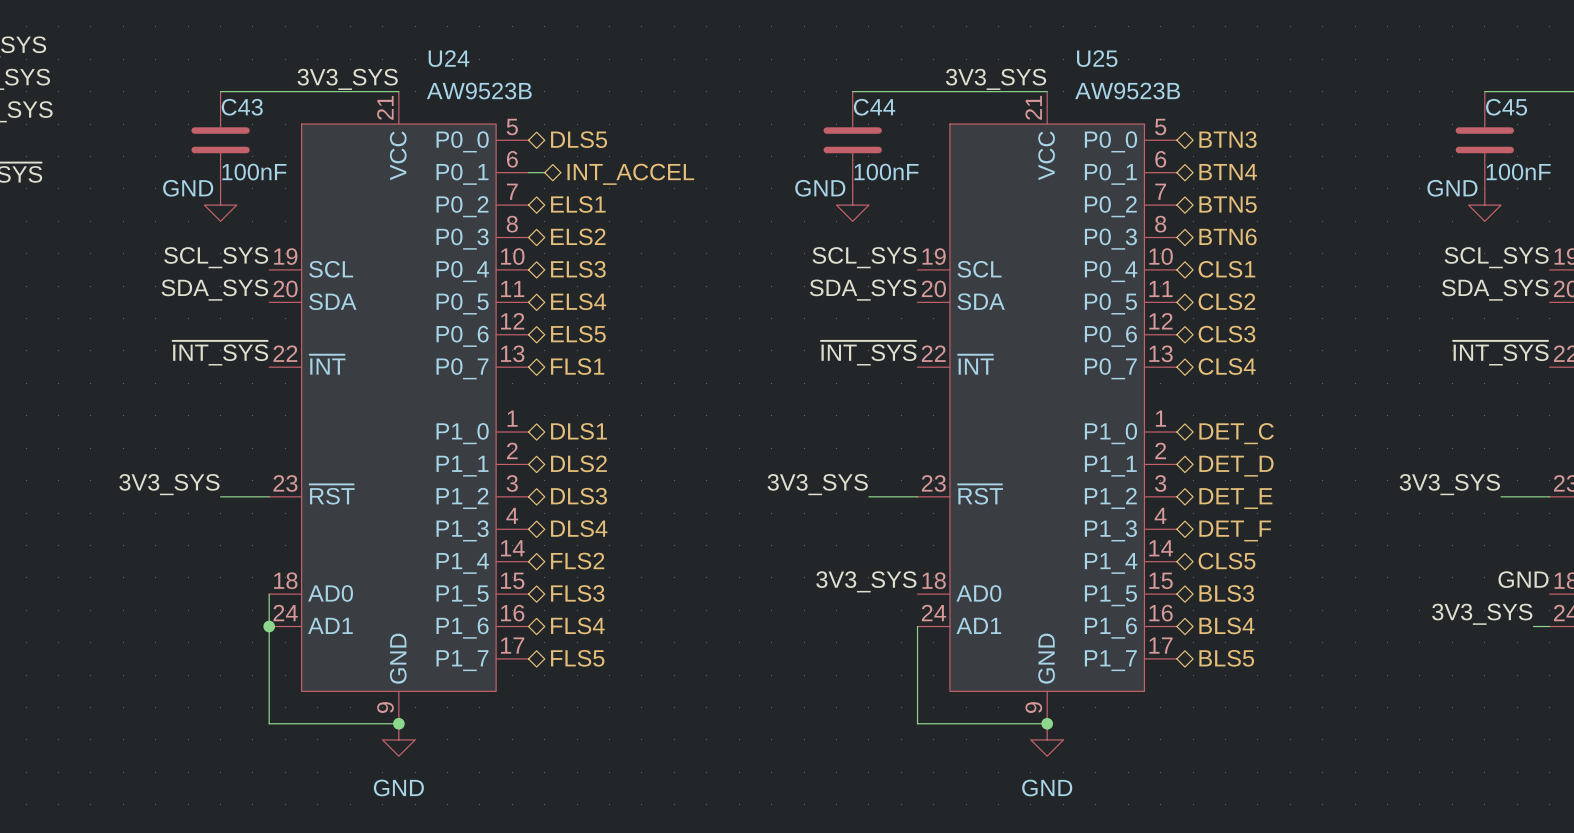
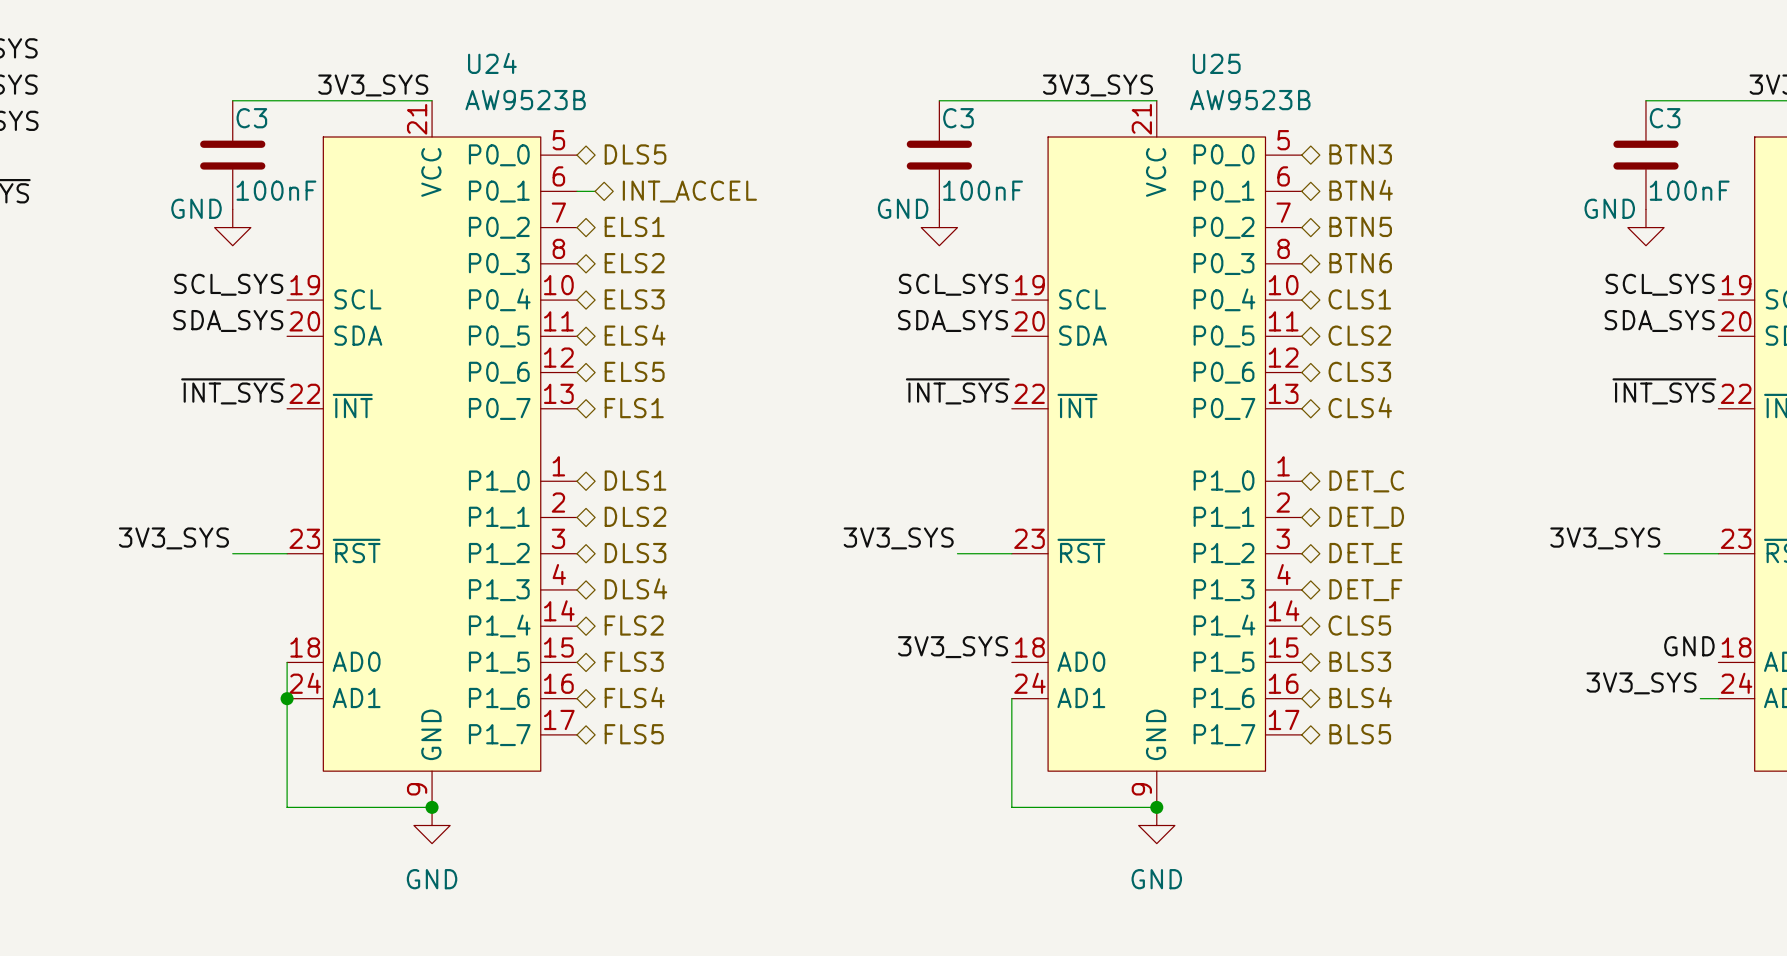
C43 name: C43 (242, 107) -> C3 (251, 118)
C44 name: C44 (874, 107) -> C3 (958, 118)
C45 name: C45 (1506, 107) -> C3 (1665, 118)

